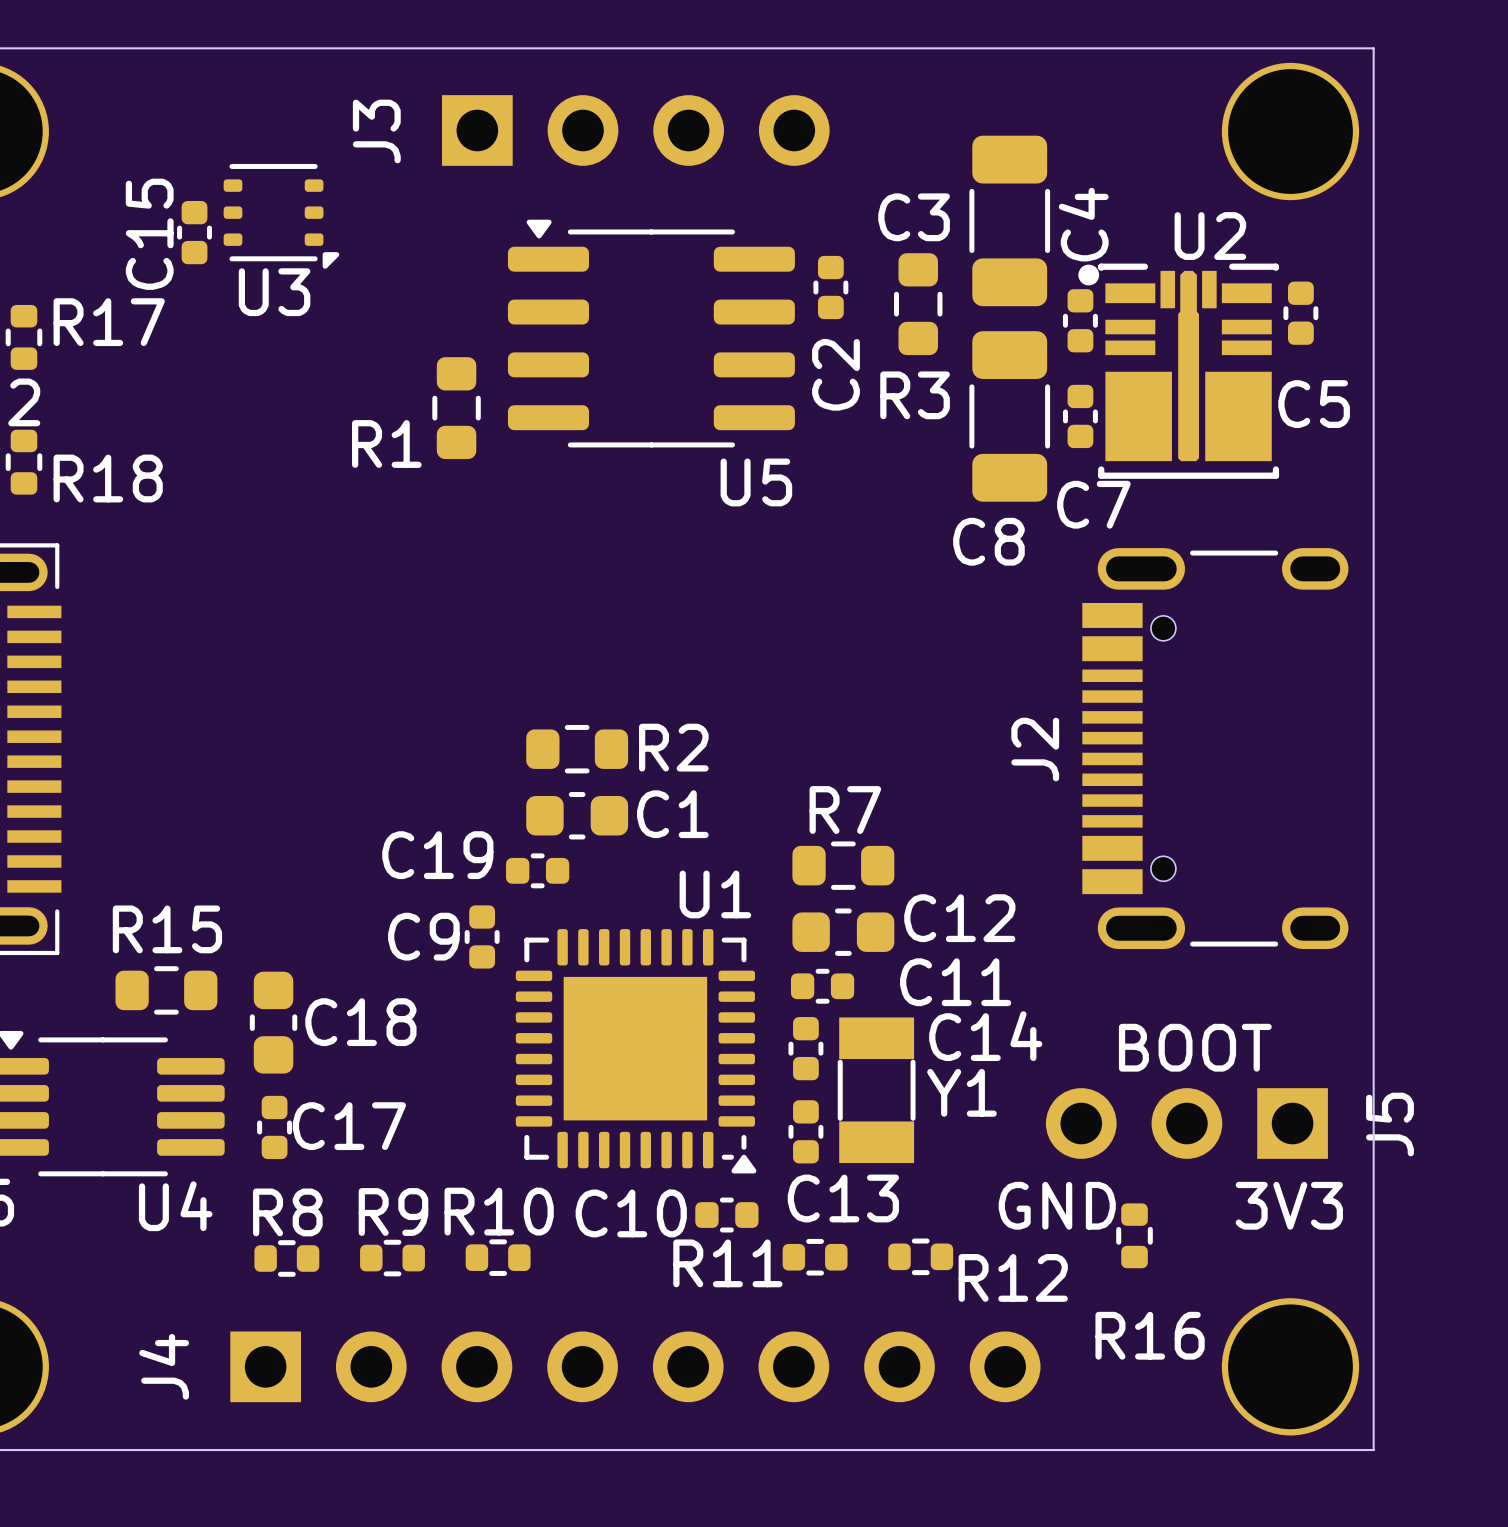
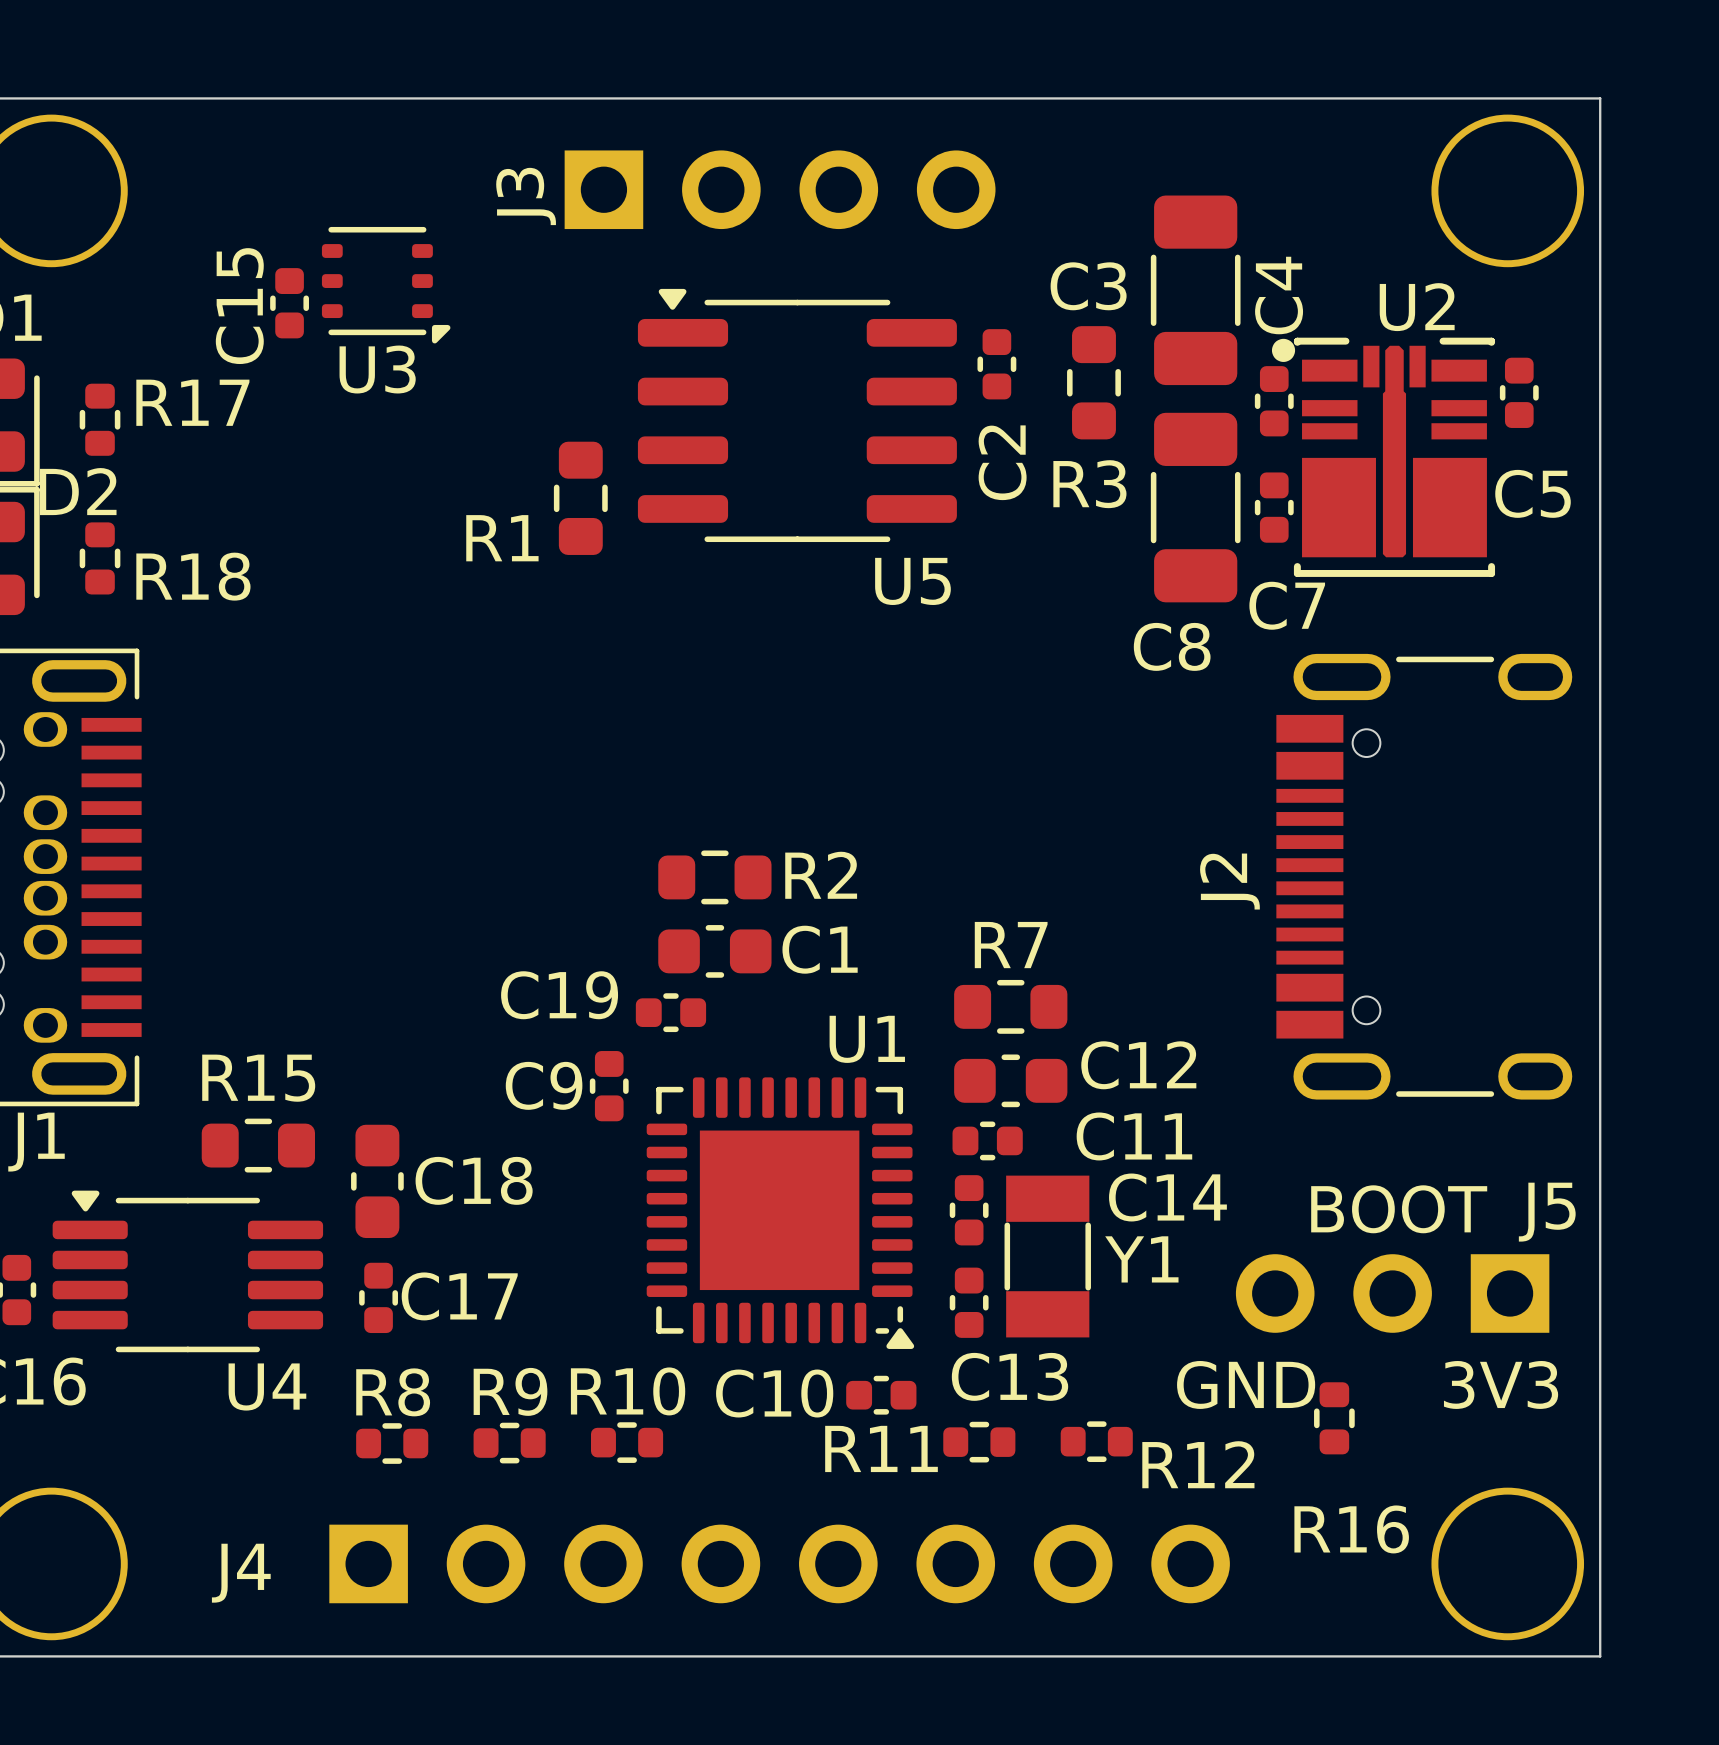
J3 name position: J3 (376, 131) -> J3 (526, 196)
J5 name rotation: 0° (1390, 1124) -> 90° clockwise (1547, 1212)
J5 name position: J5 (1390, 1124) -> J5 (1547, 1212)
J4 name rotation: 0° (164, 1366) -> 90° clockwise (241, 1573)

